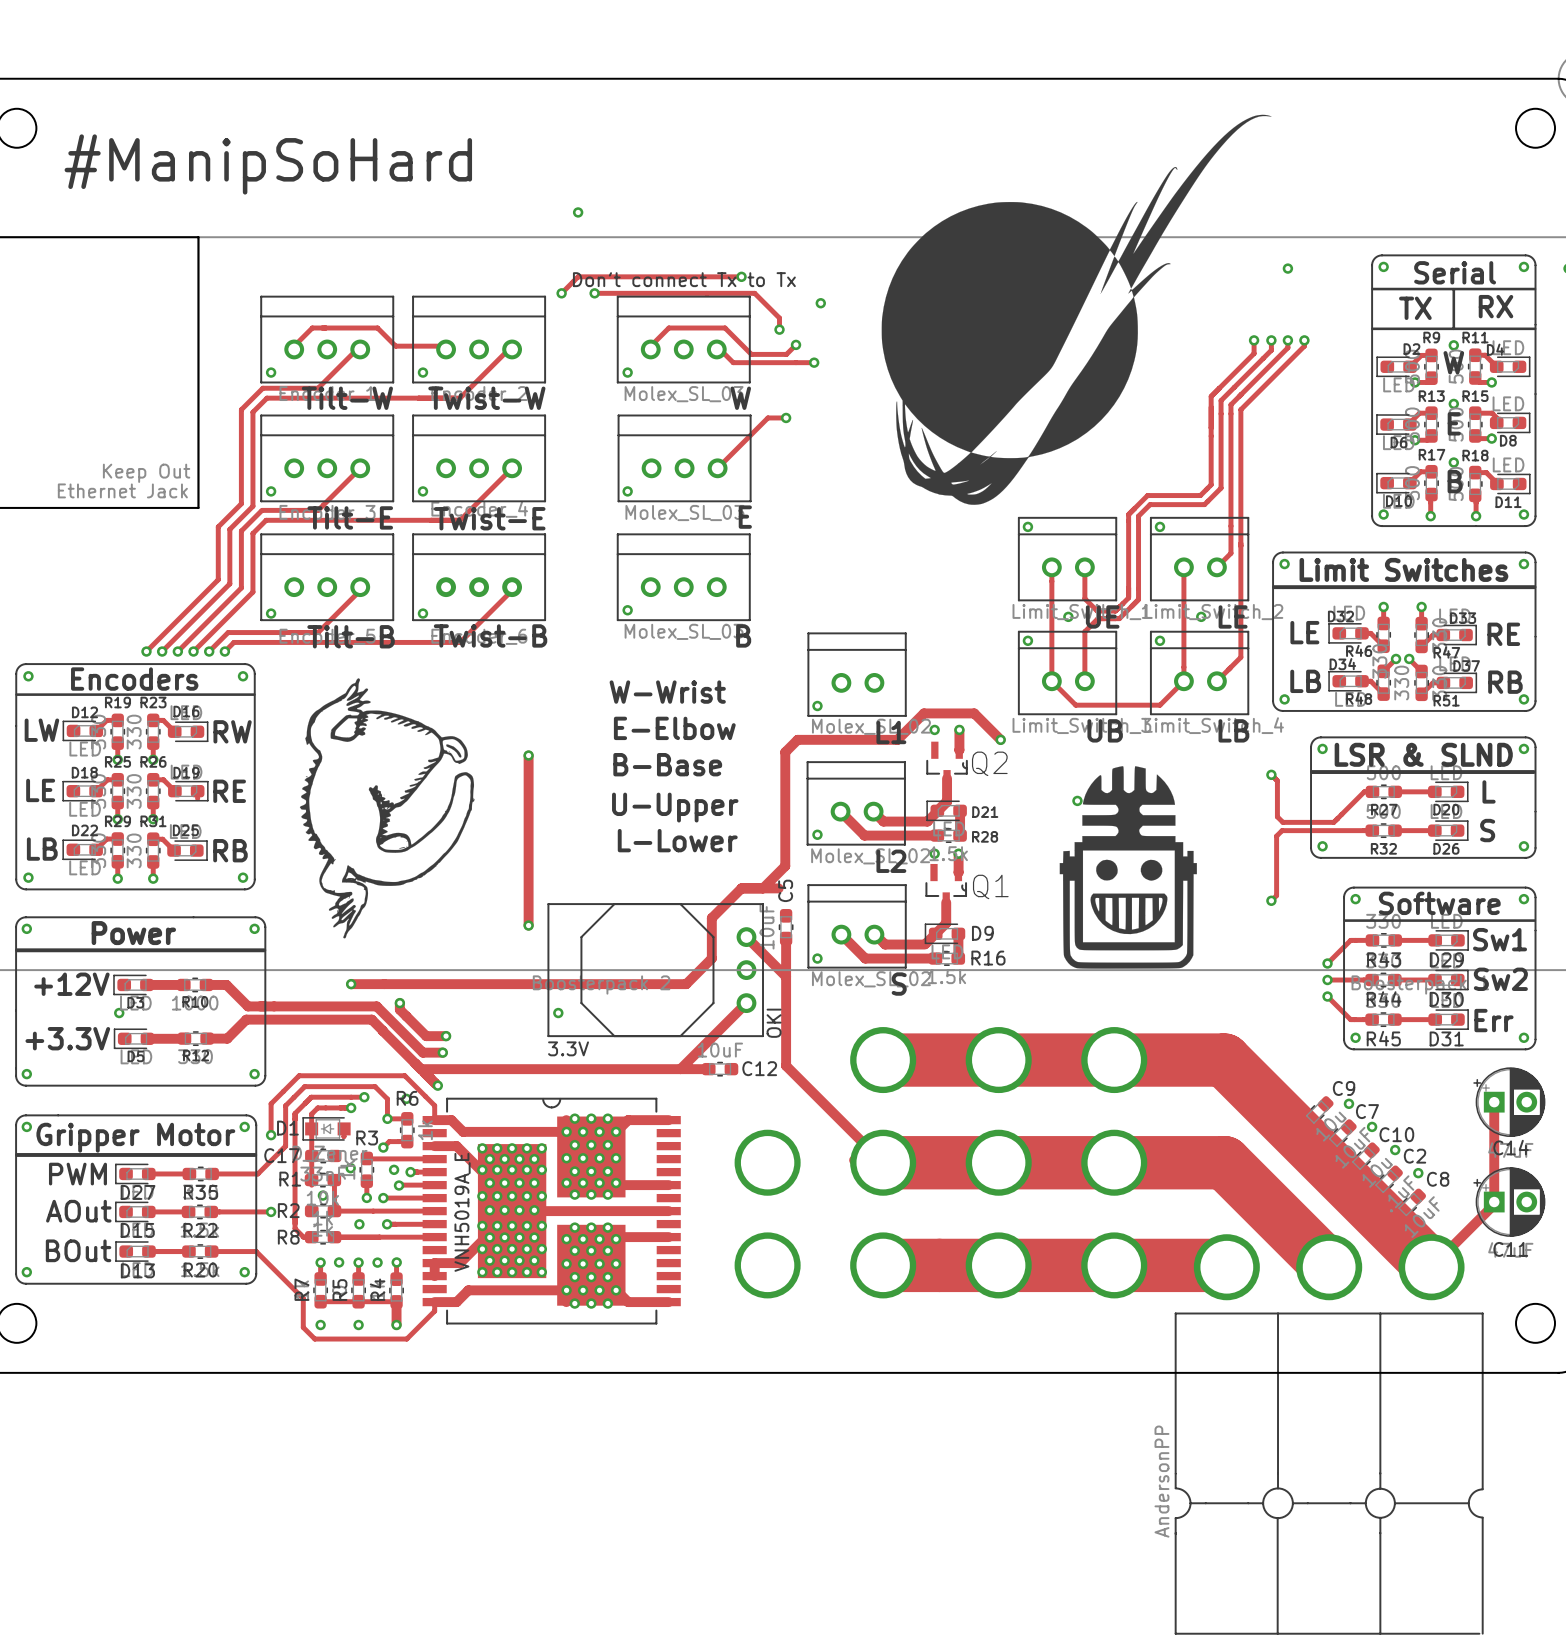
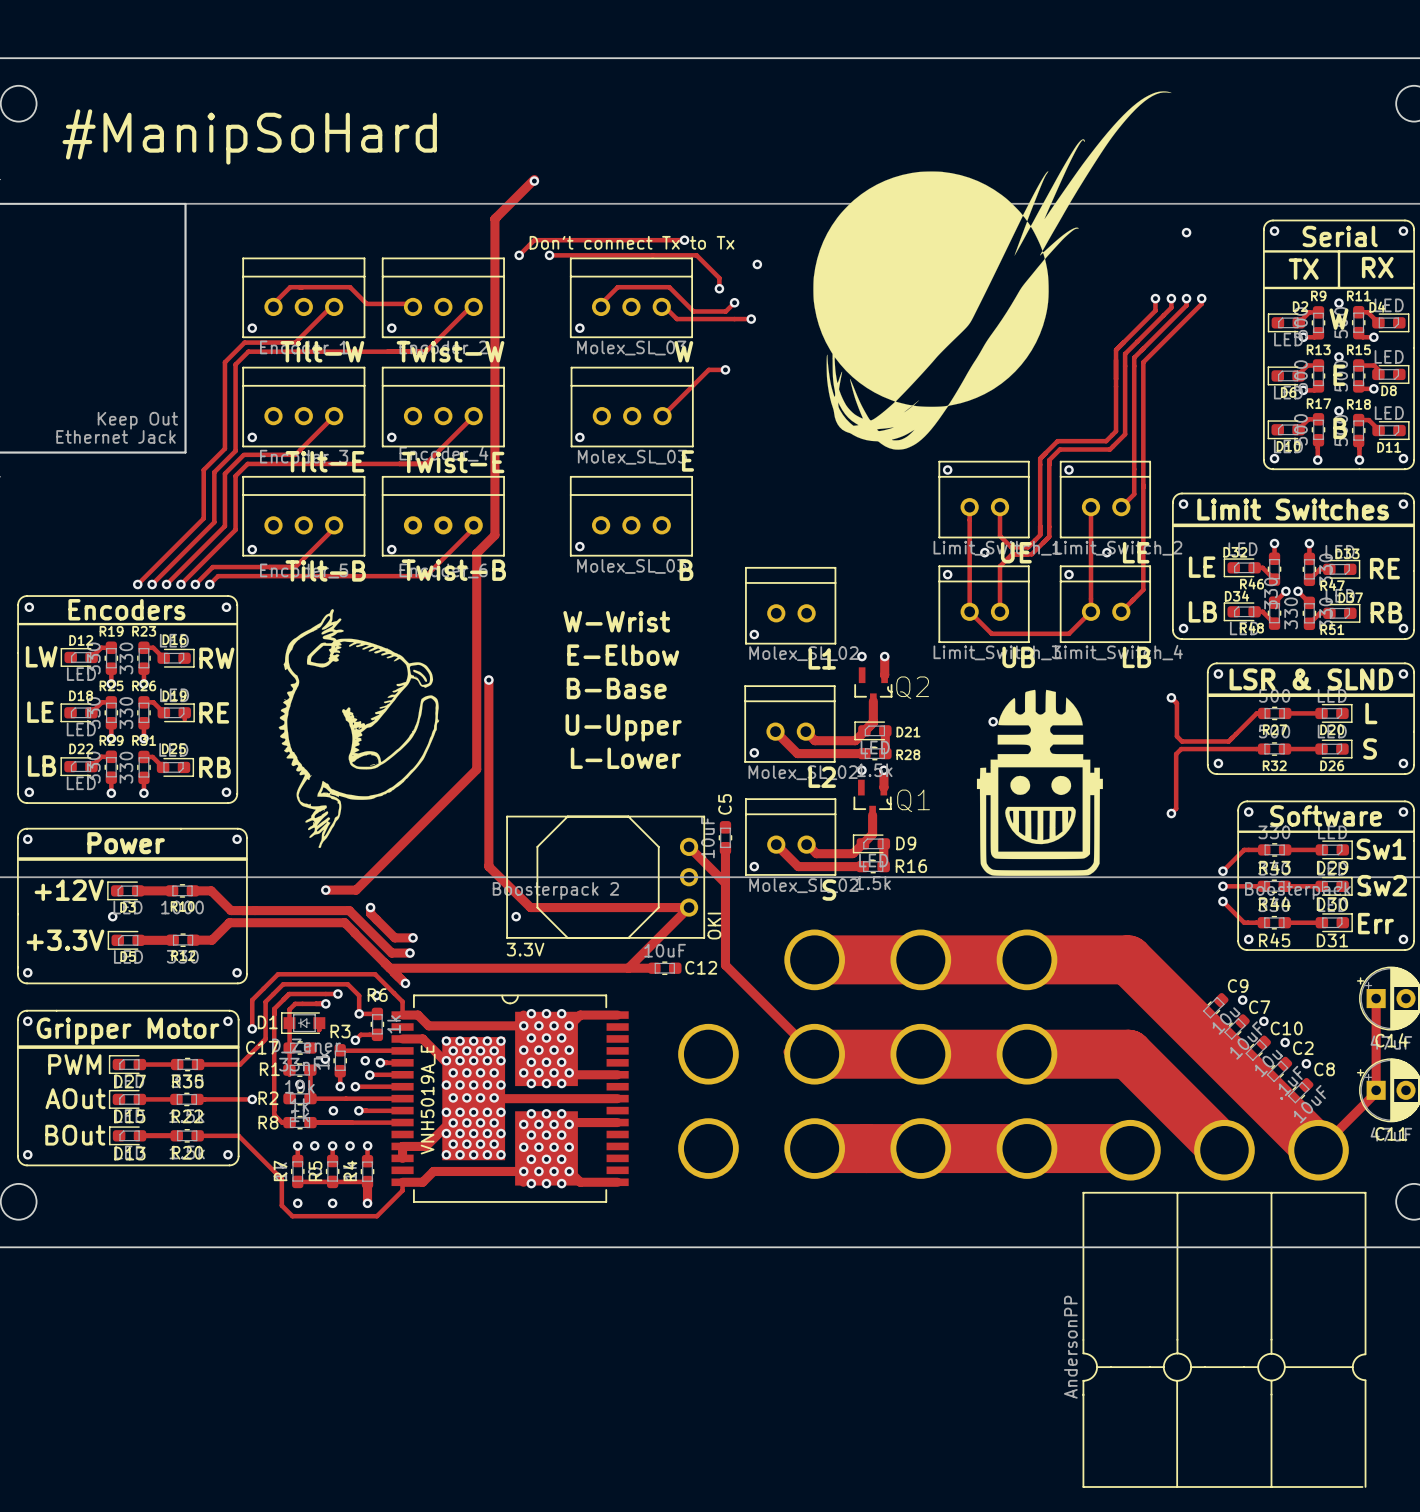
track: (1000, 739) (974, 713) (923, 713) (897, 739) (797, 739) (785, 752) (785, 866) (763, 888) -> none
via: (1000, 739) -> none
track: (778, 888) (741, 888) (711, 918) (711, 958) (686, 984) (384, 984) -> (496, 217) (534, 179) (494, 218) (494, 535) (476, 553) (476, 769) (356, 890)
track: none -> (488, 836) (488, 866) (530, 907) (689, 907)
via: (528, 925) -> none

